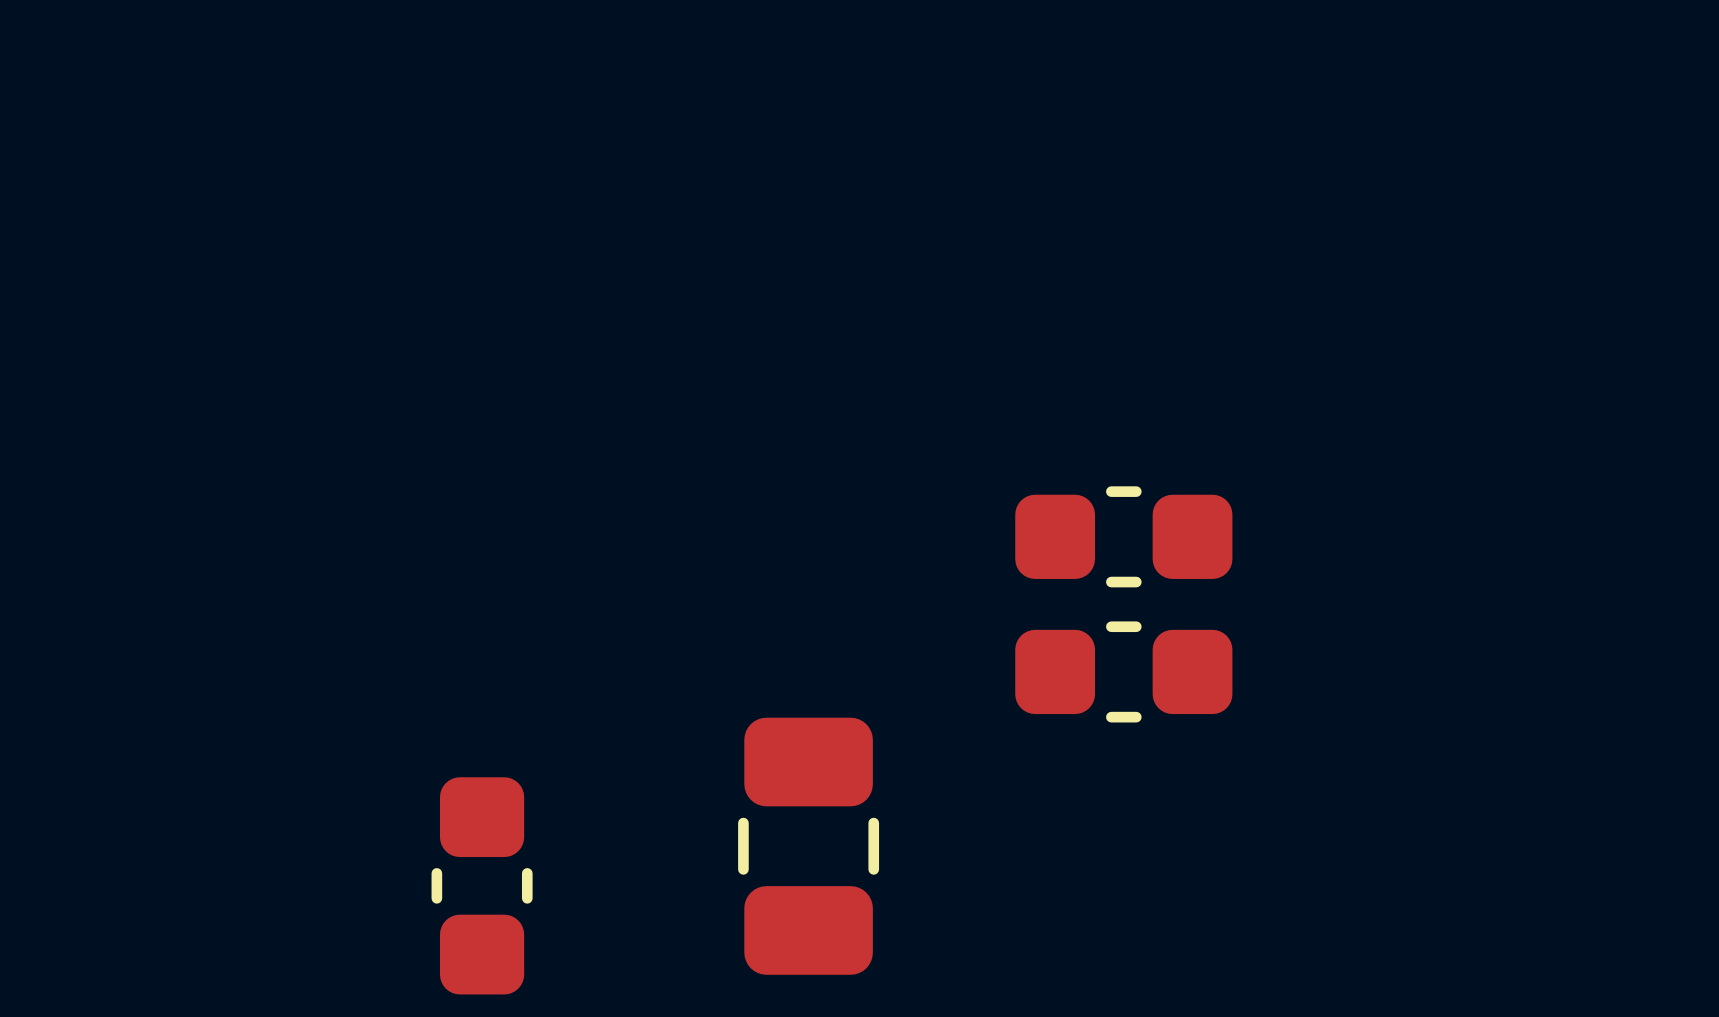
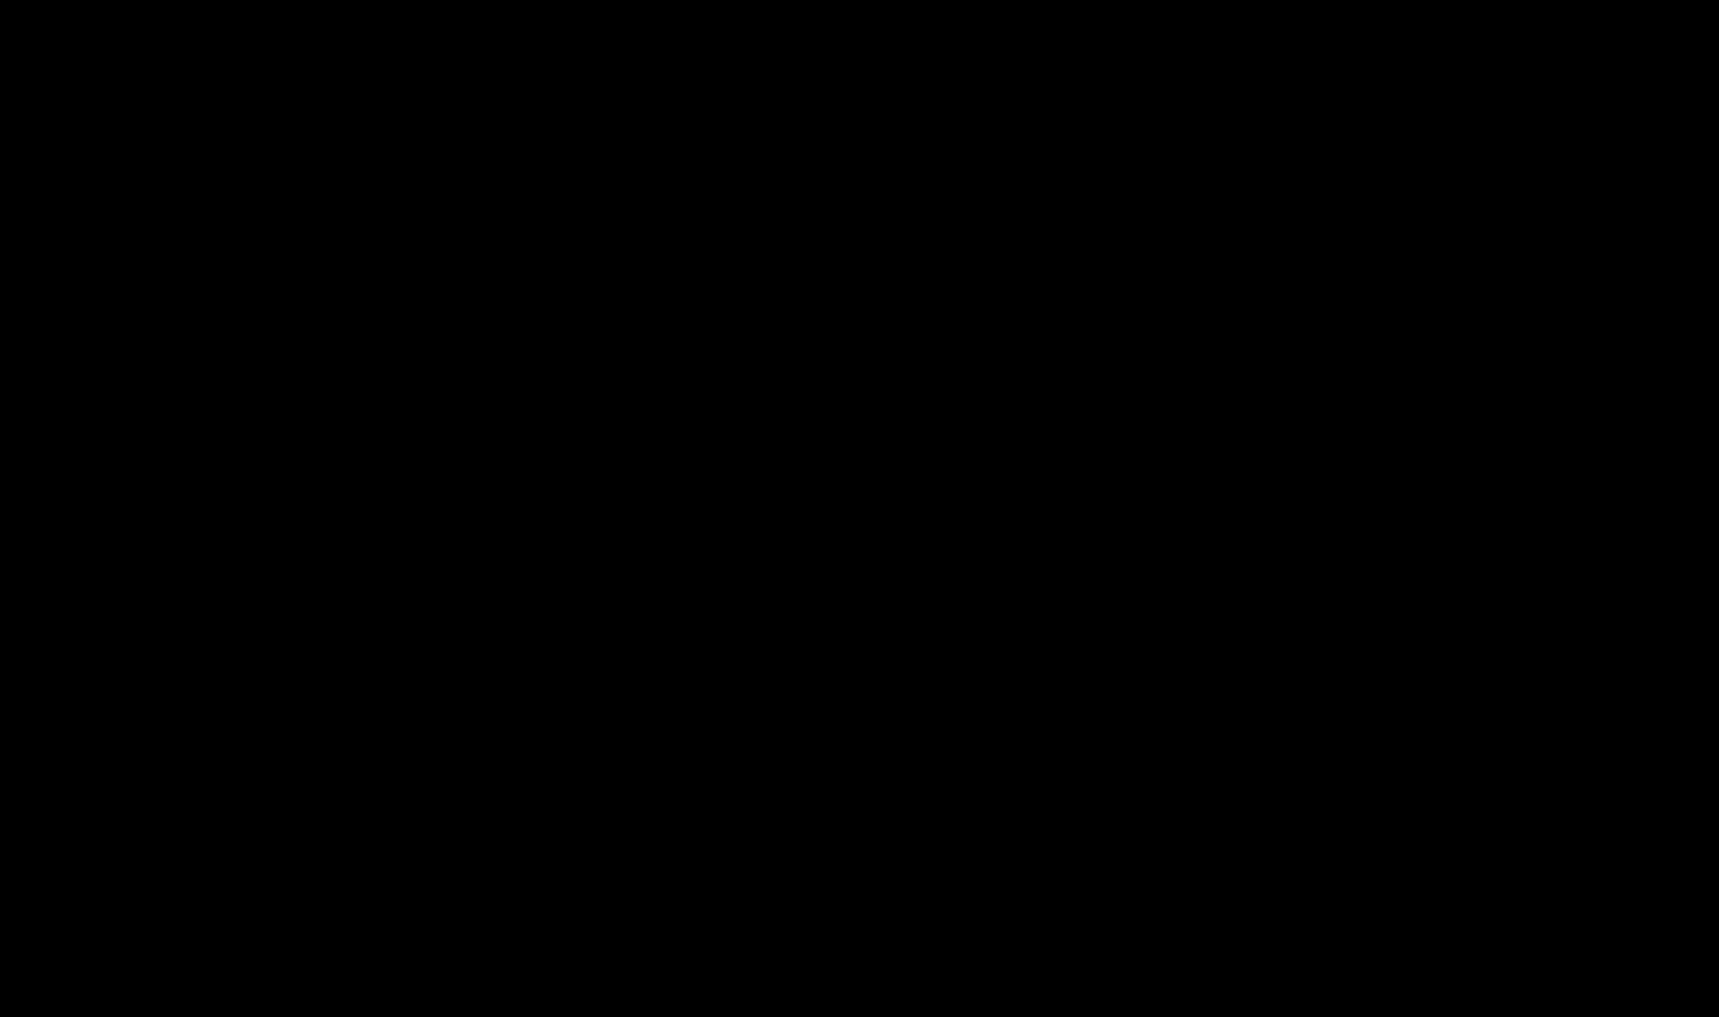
part: (1123, 536) -> none
part: (1123, 671) -> none
part: (808, 846) -> none
part: (482, 885) -> none

